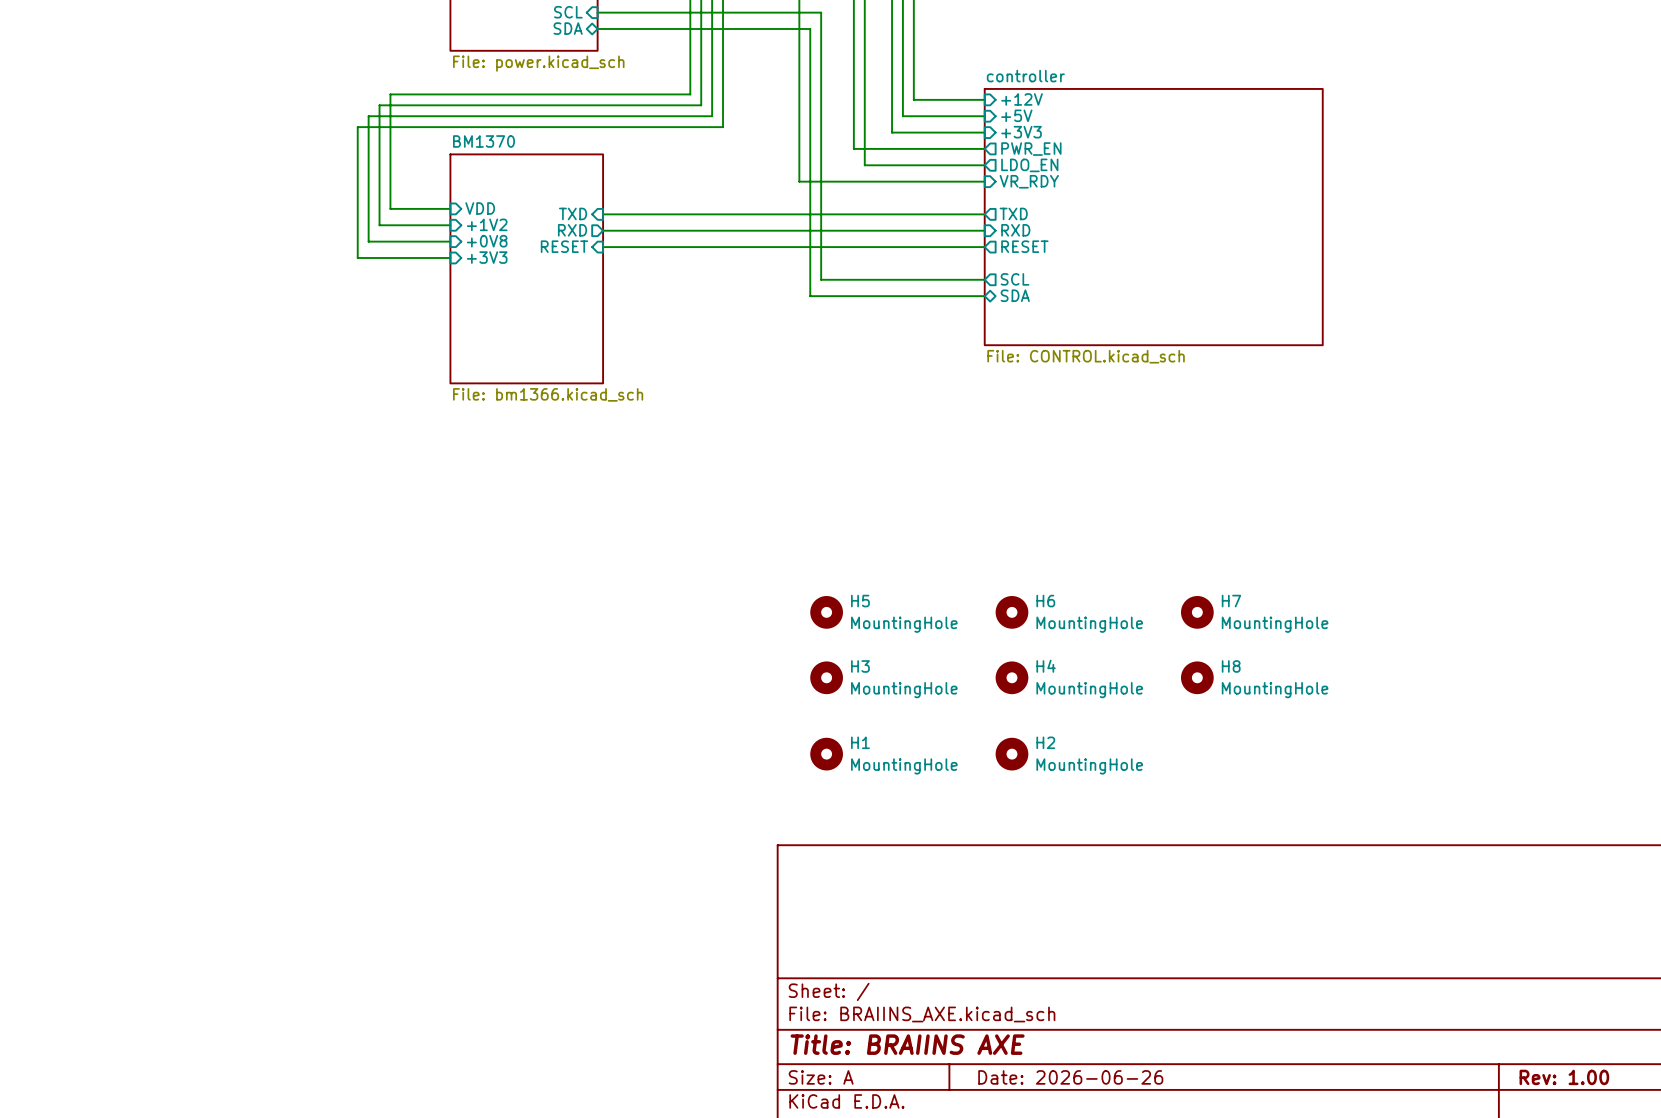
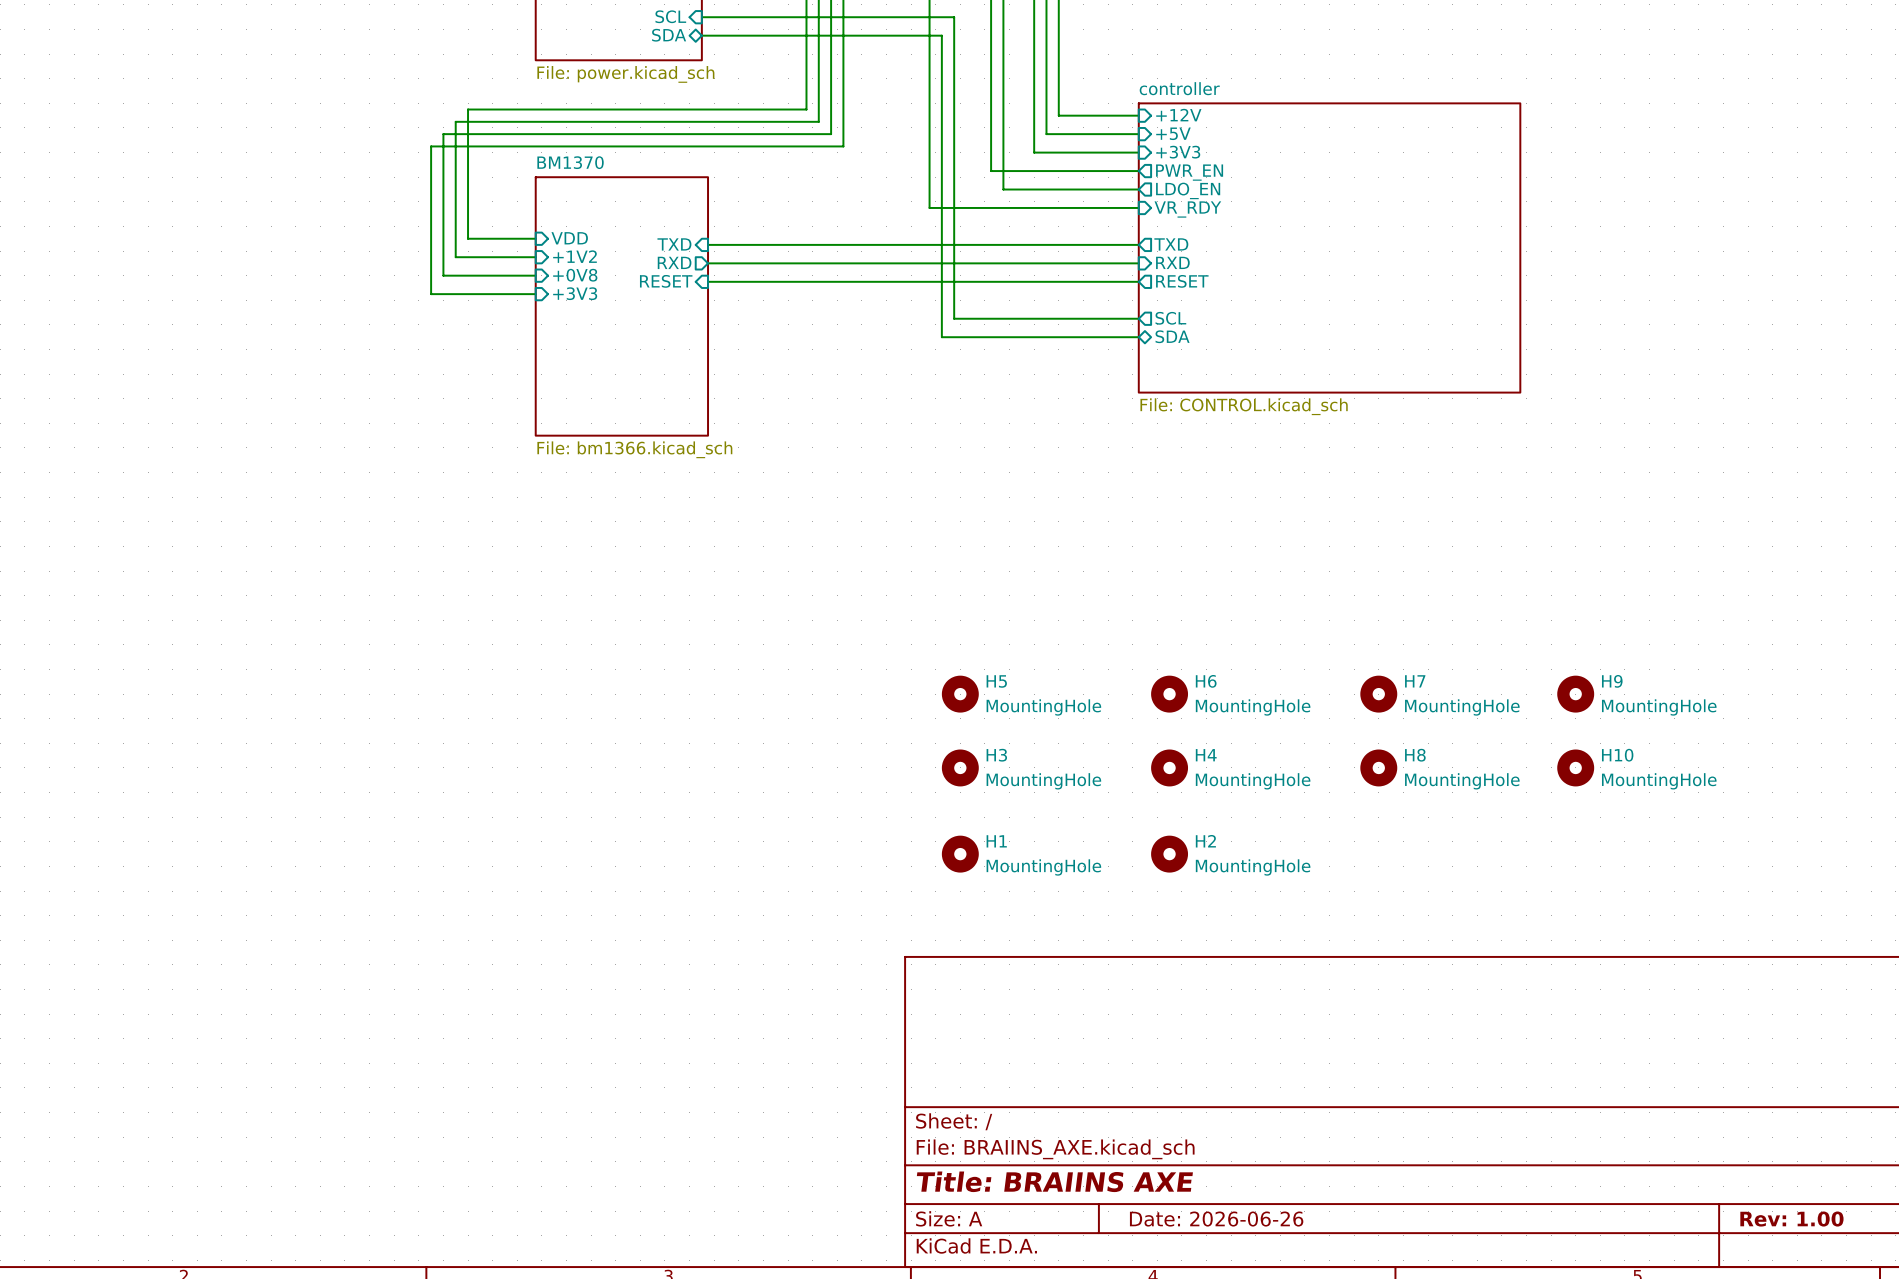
H9: none -> MountingHole (1575, 694)
H10: none -> MountingHole (1575, 767)

